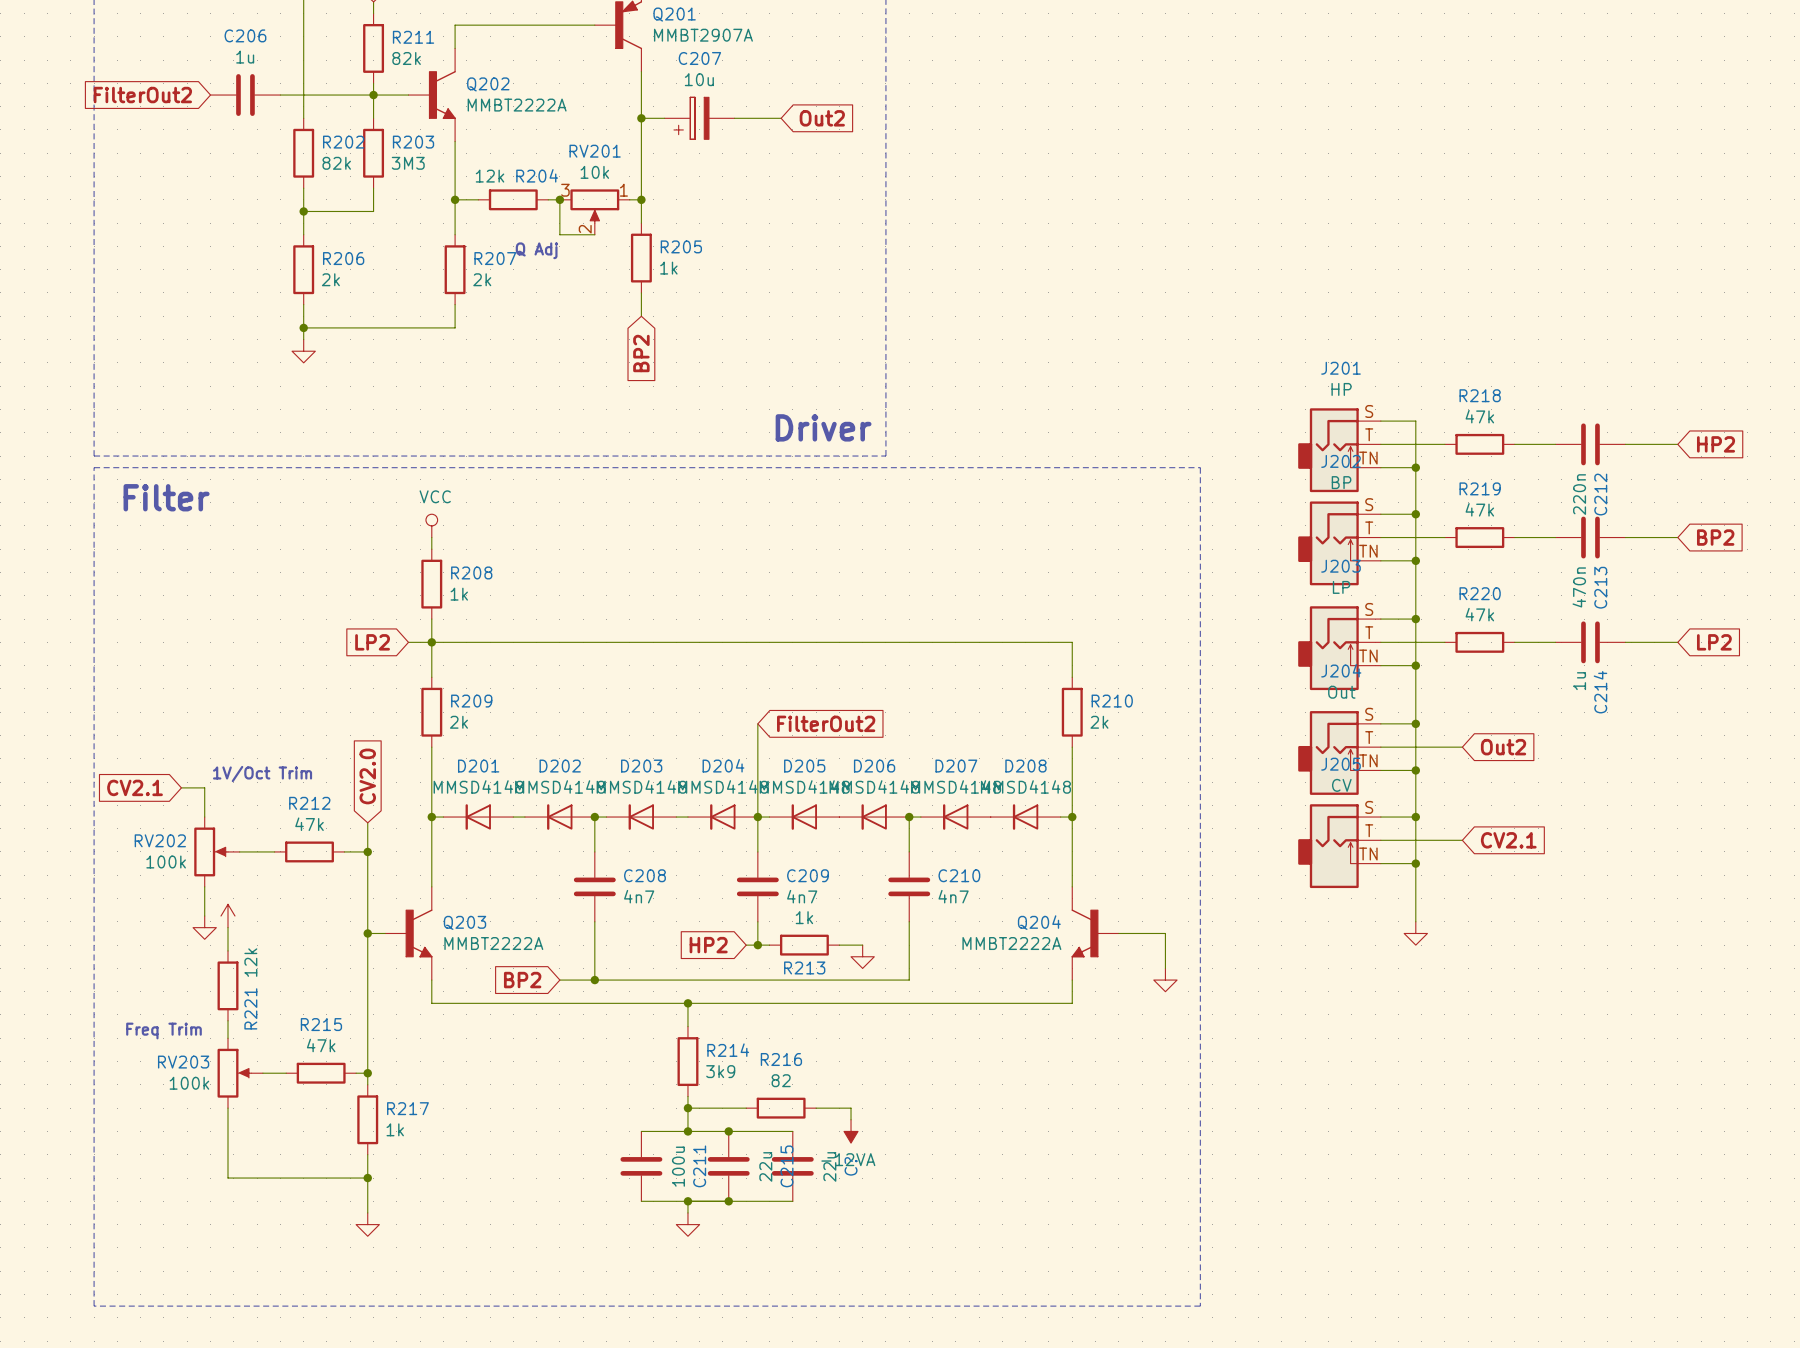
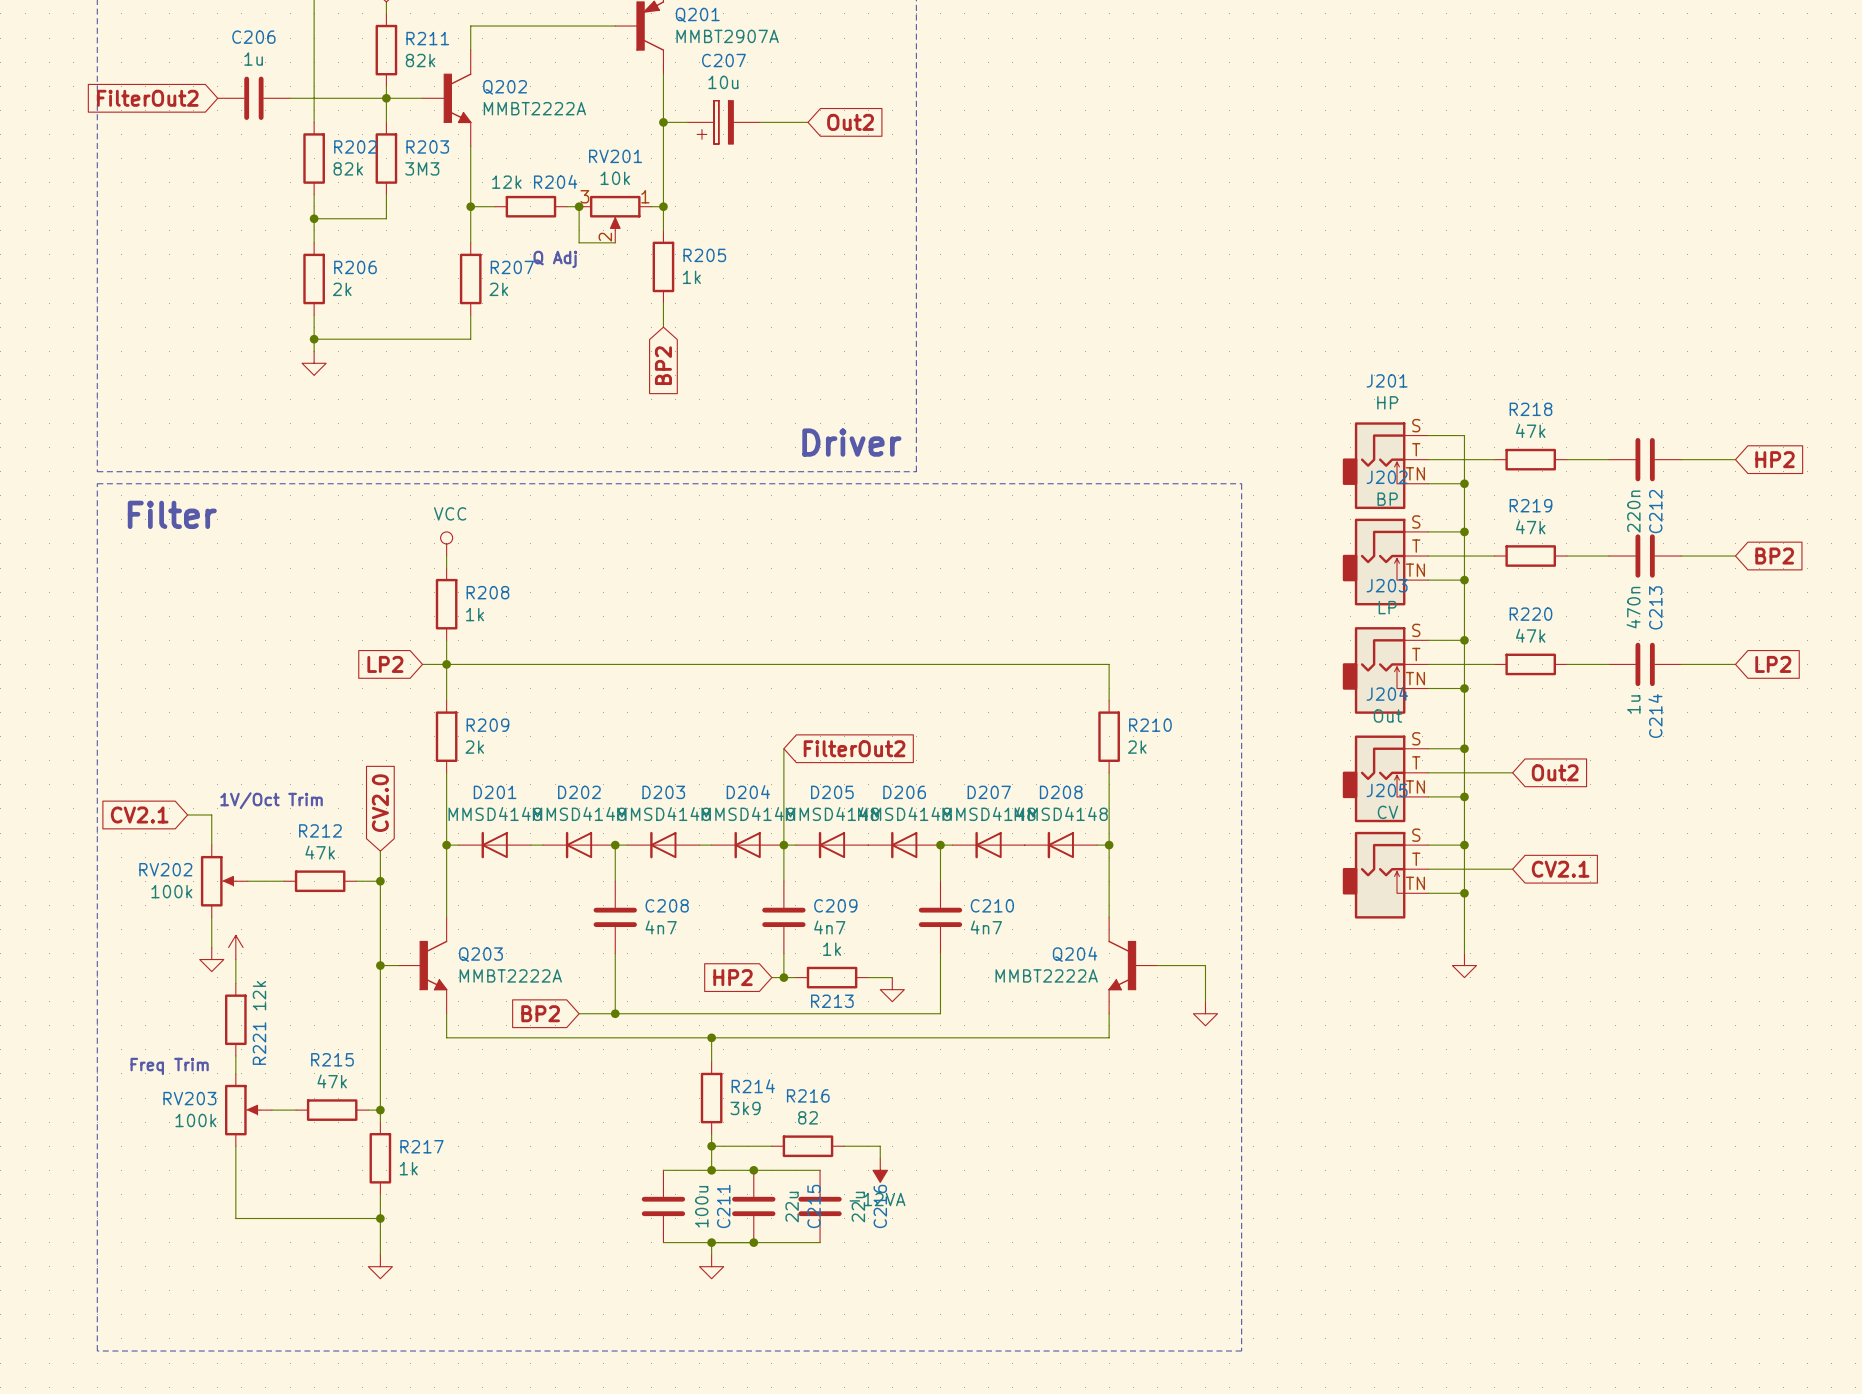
C? name: C? (851, 1166) -> C216 (880, 1206)

